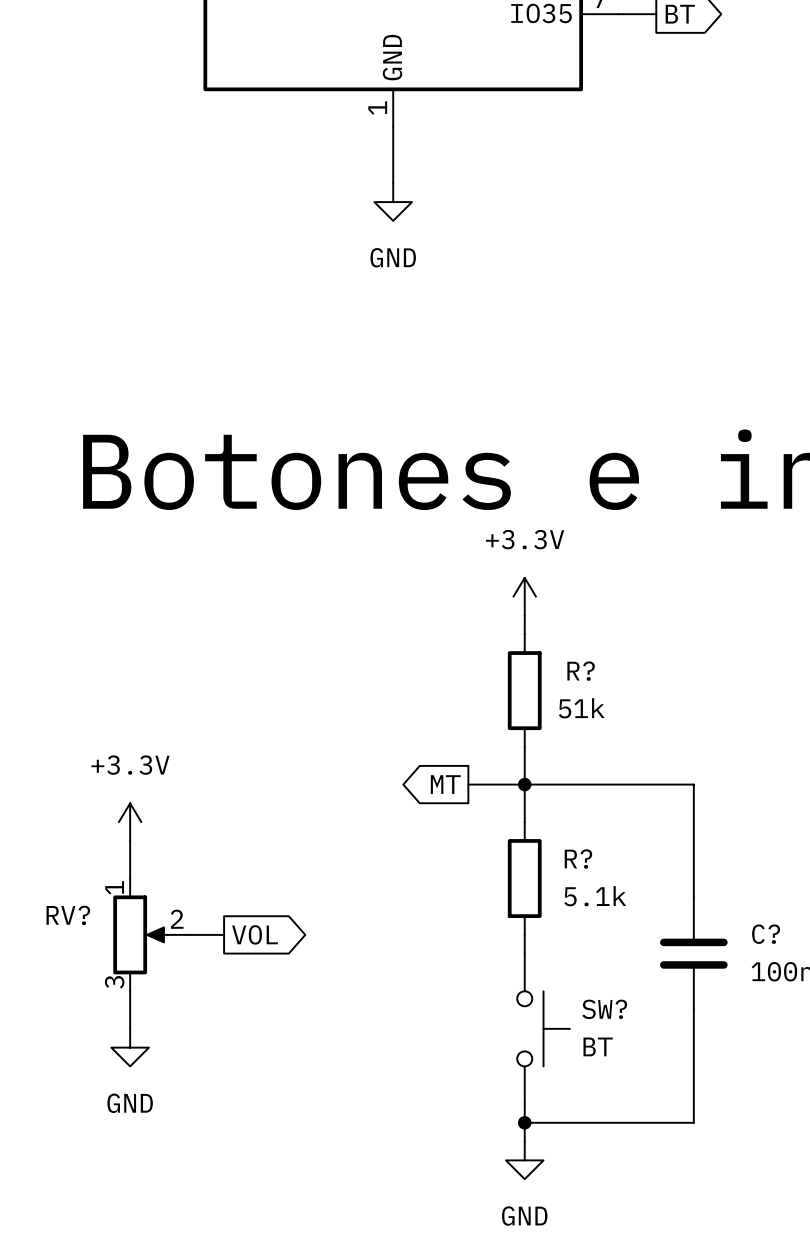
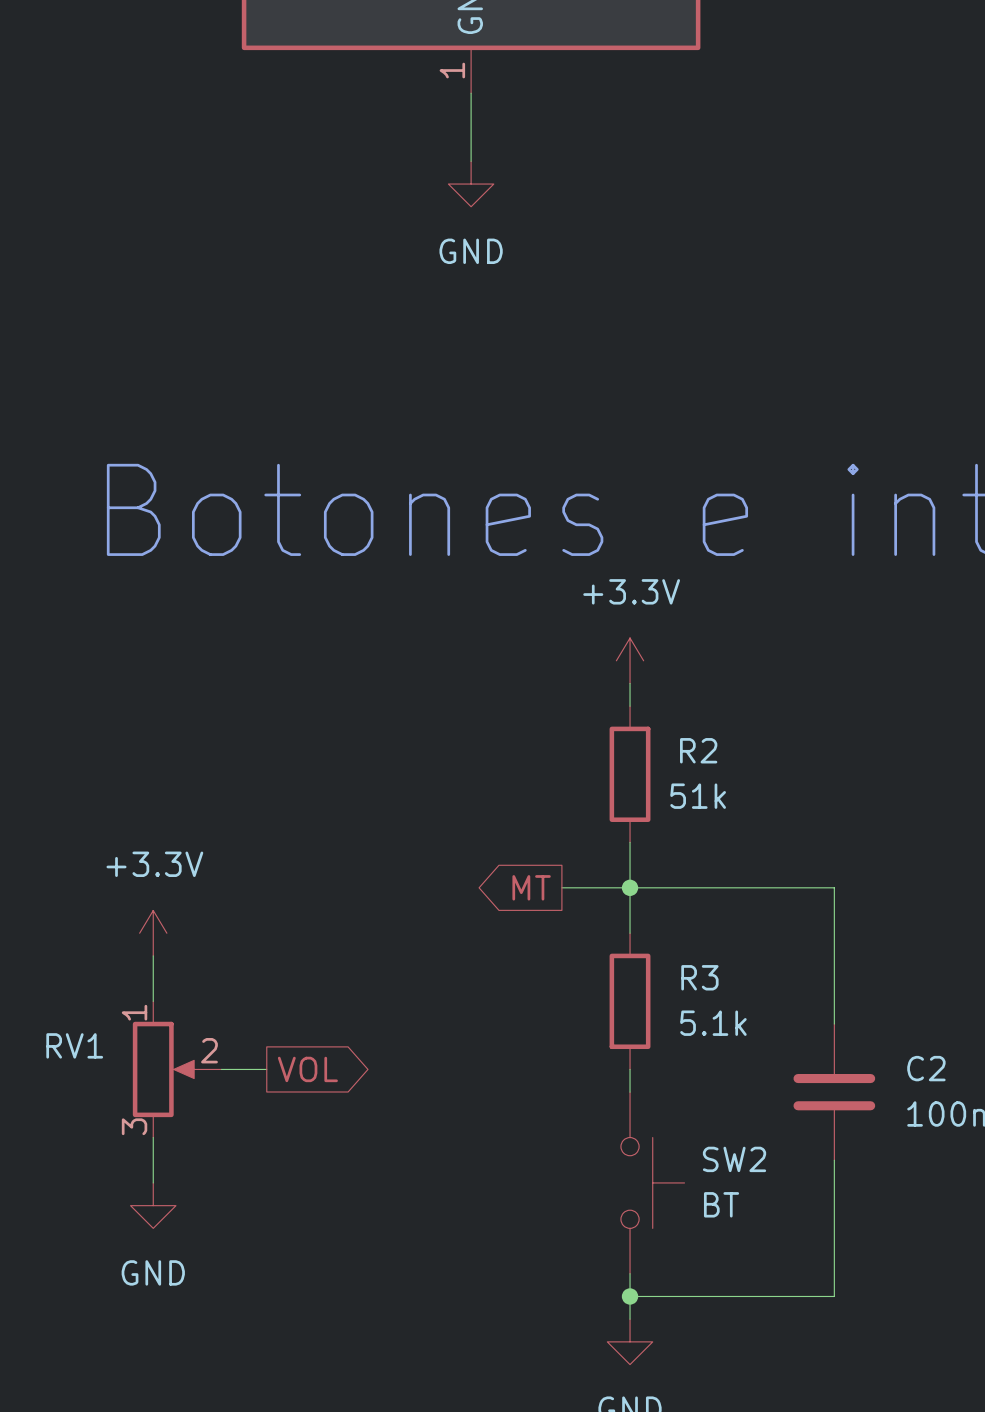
R? name: R? (581, 671) -> R2 (698, 750)
R? name: R? (578, 858) -> R3 (699, 977)
RV? name: RV? (68, 915) -> RV1 (74, 1045)
C? name: C? (766, 934) -> C2 (926, 1068)
SW? name: SW? (604, 1009) -> SW2 (734, 1159)

